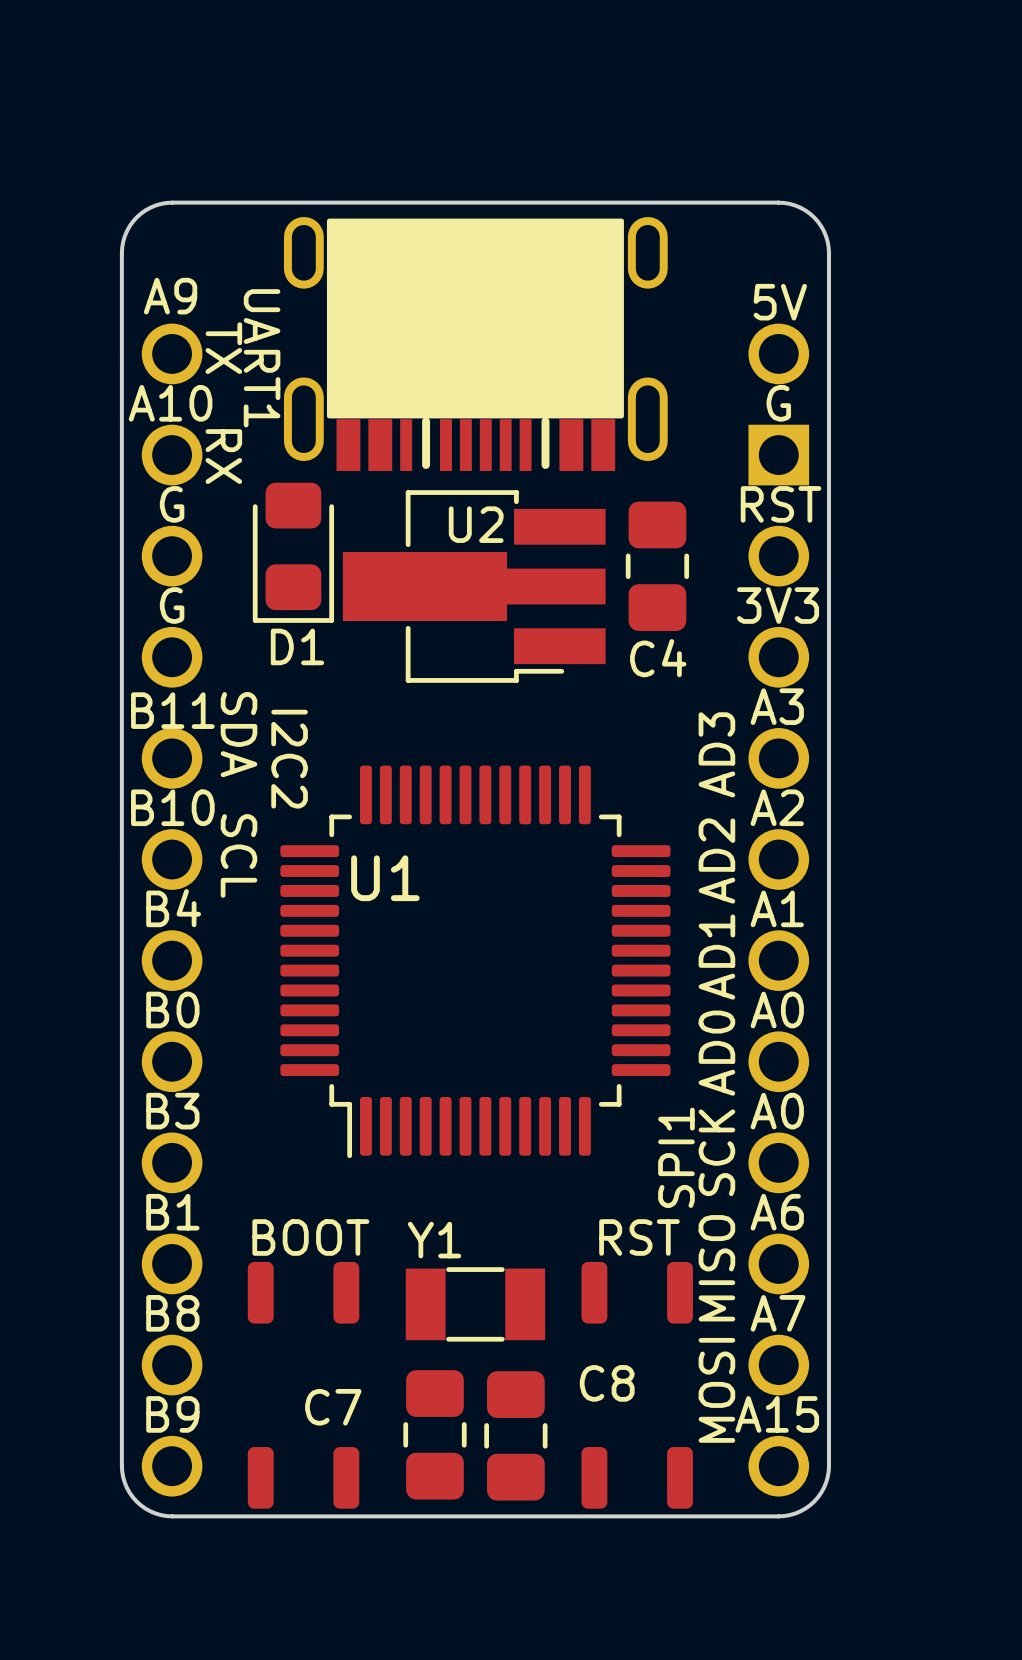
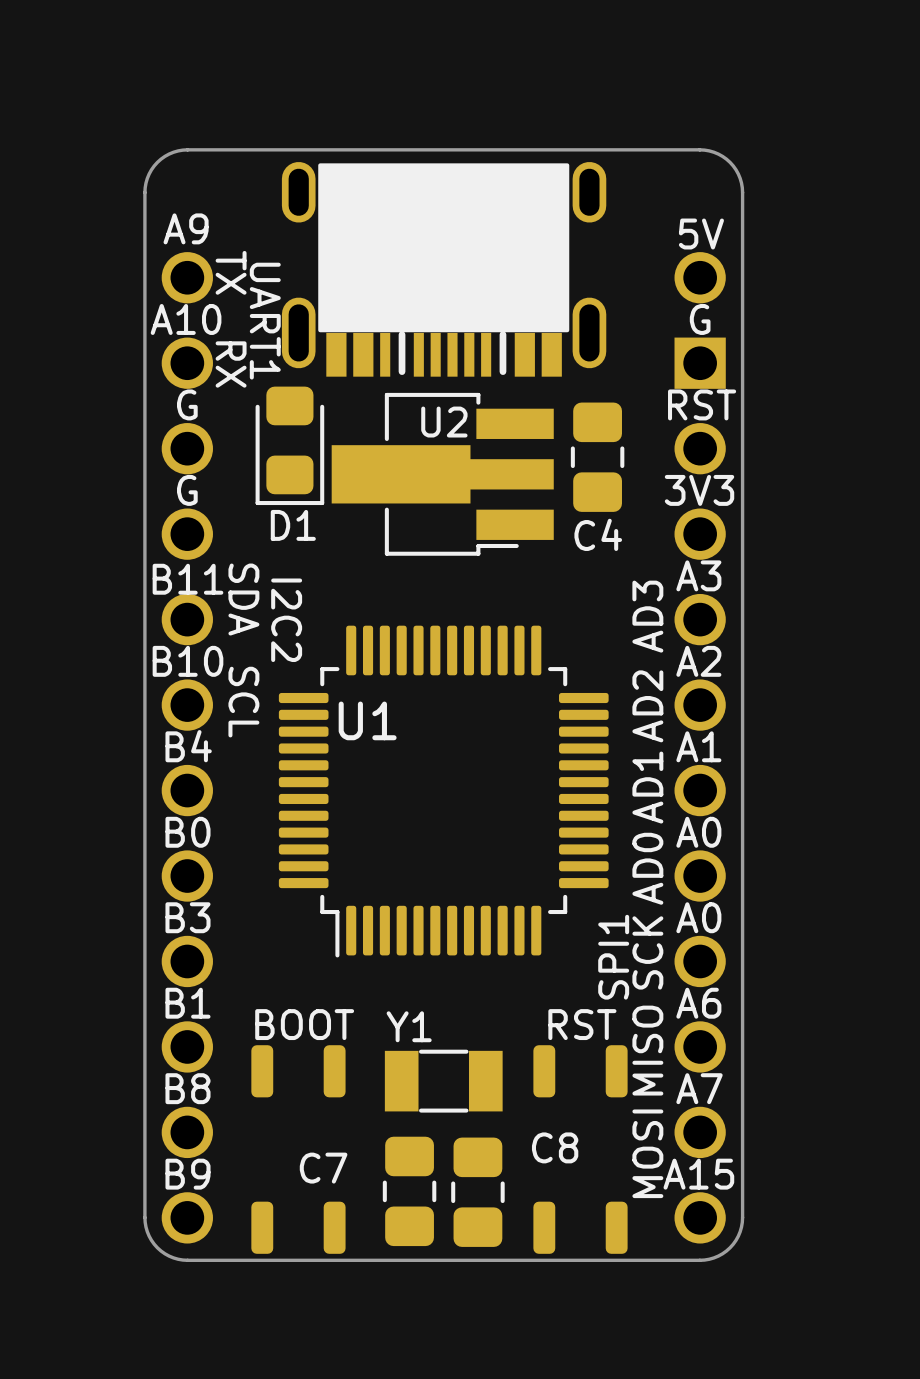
text position: UART1 (262, 358) -> UART1 (265, 321)

